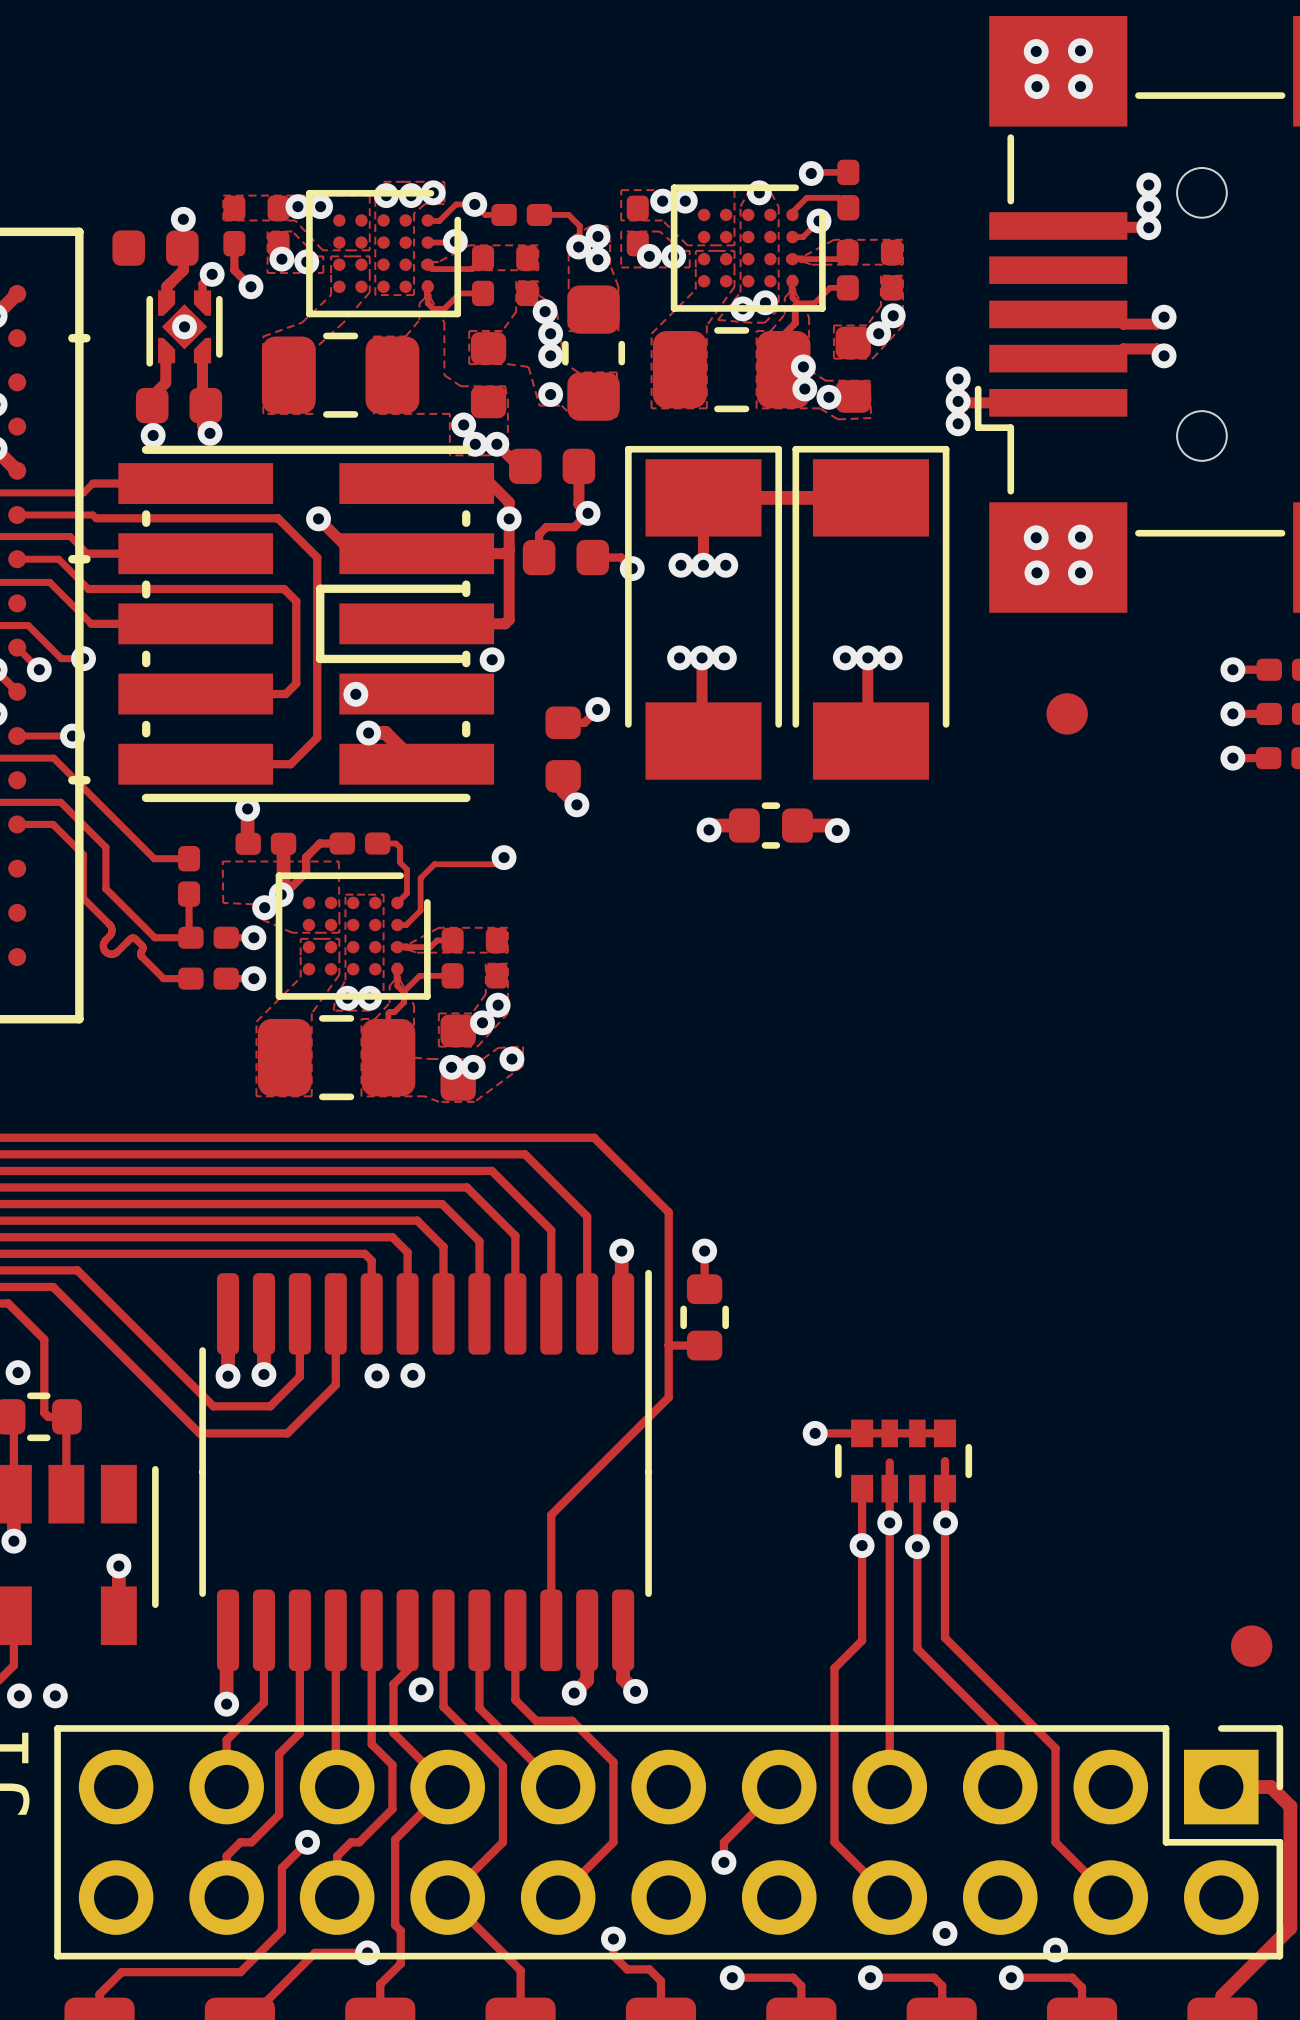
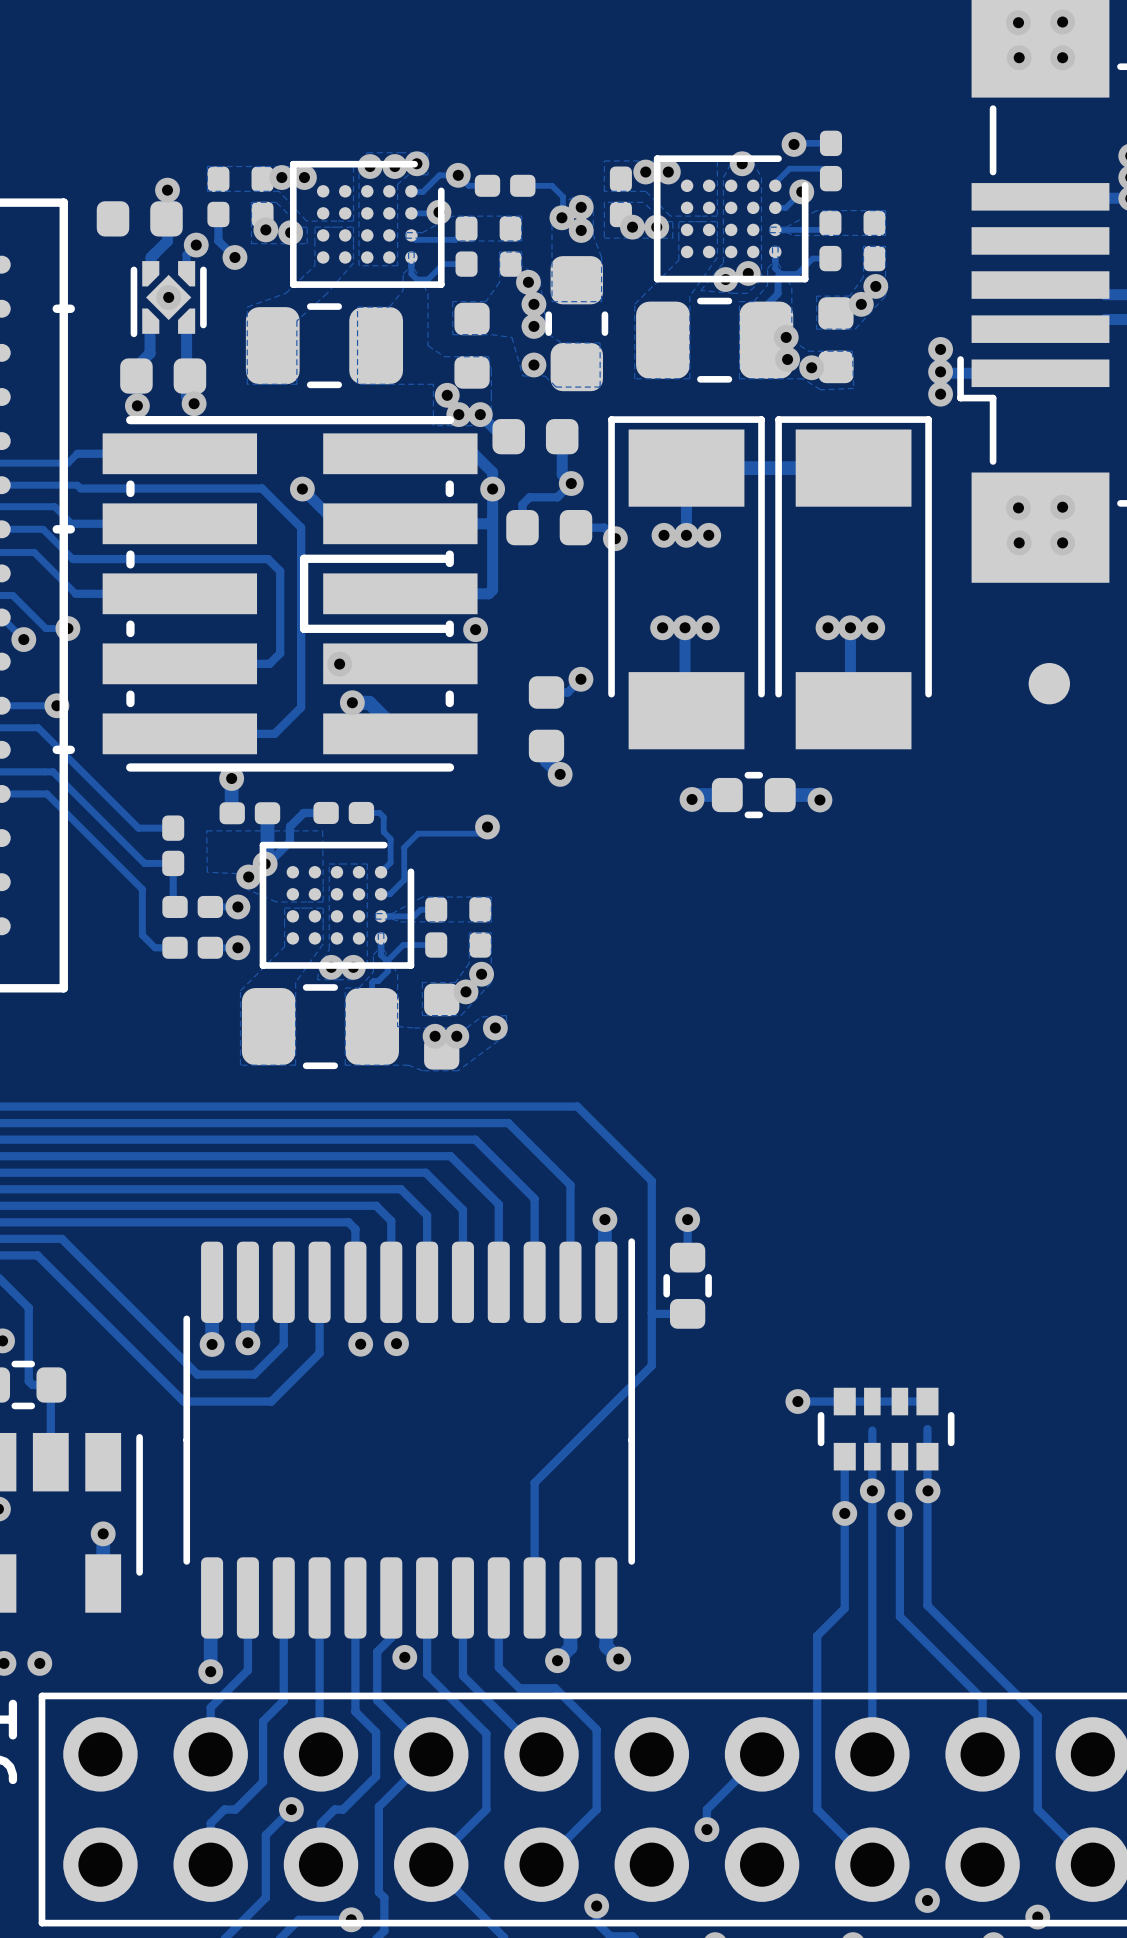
track: (60, 802) (105, 847) (105, 888) (154, 937) (190, 937) -> (45, 771) (53, 771) (144, 863) (173, 863)
track: (53, 824) (83, 854) (83, 898) (109, 924) (111, 929) (110, 934) (103, 943) (104, 950) (108, 953) (114, 953) (130, 939) -> (37, 793) (46, 793) (142, 889) (142, 935) (155, 947)
track: (135, 939) (141, 945) -> none
track: (141, 956) (163, 978) (170, 978) -> none

